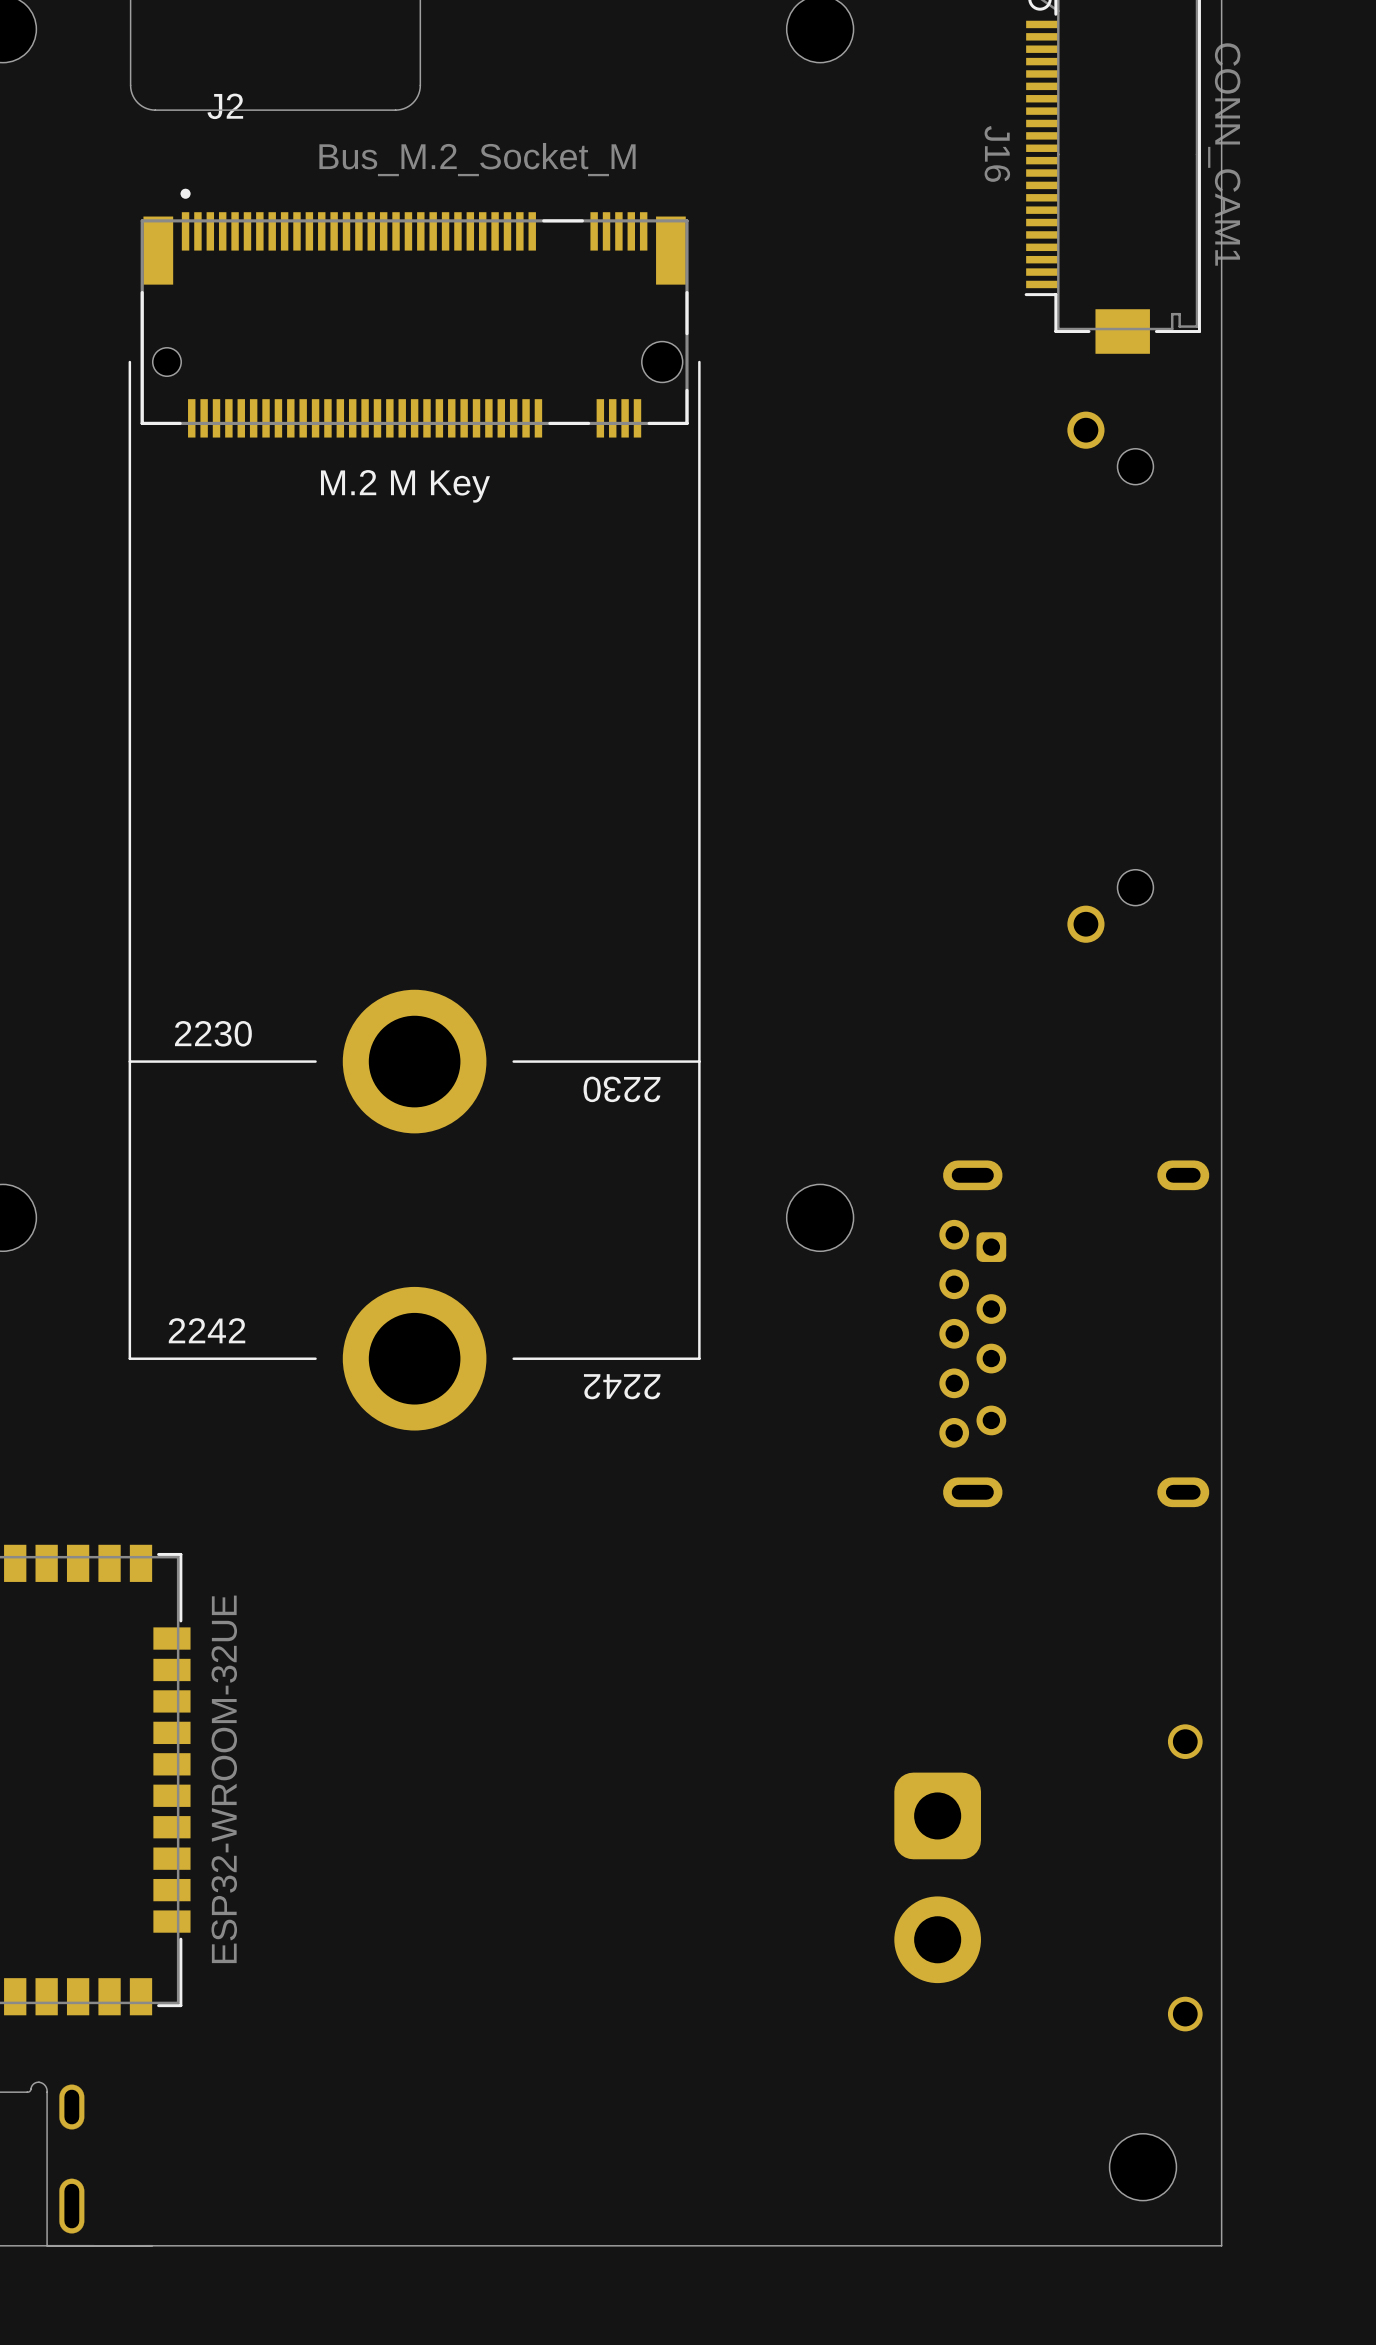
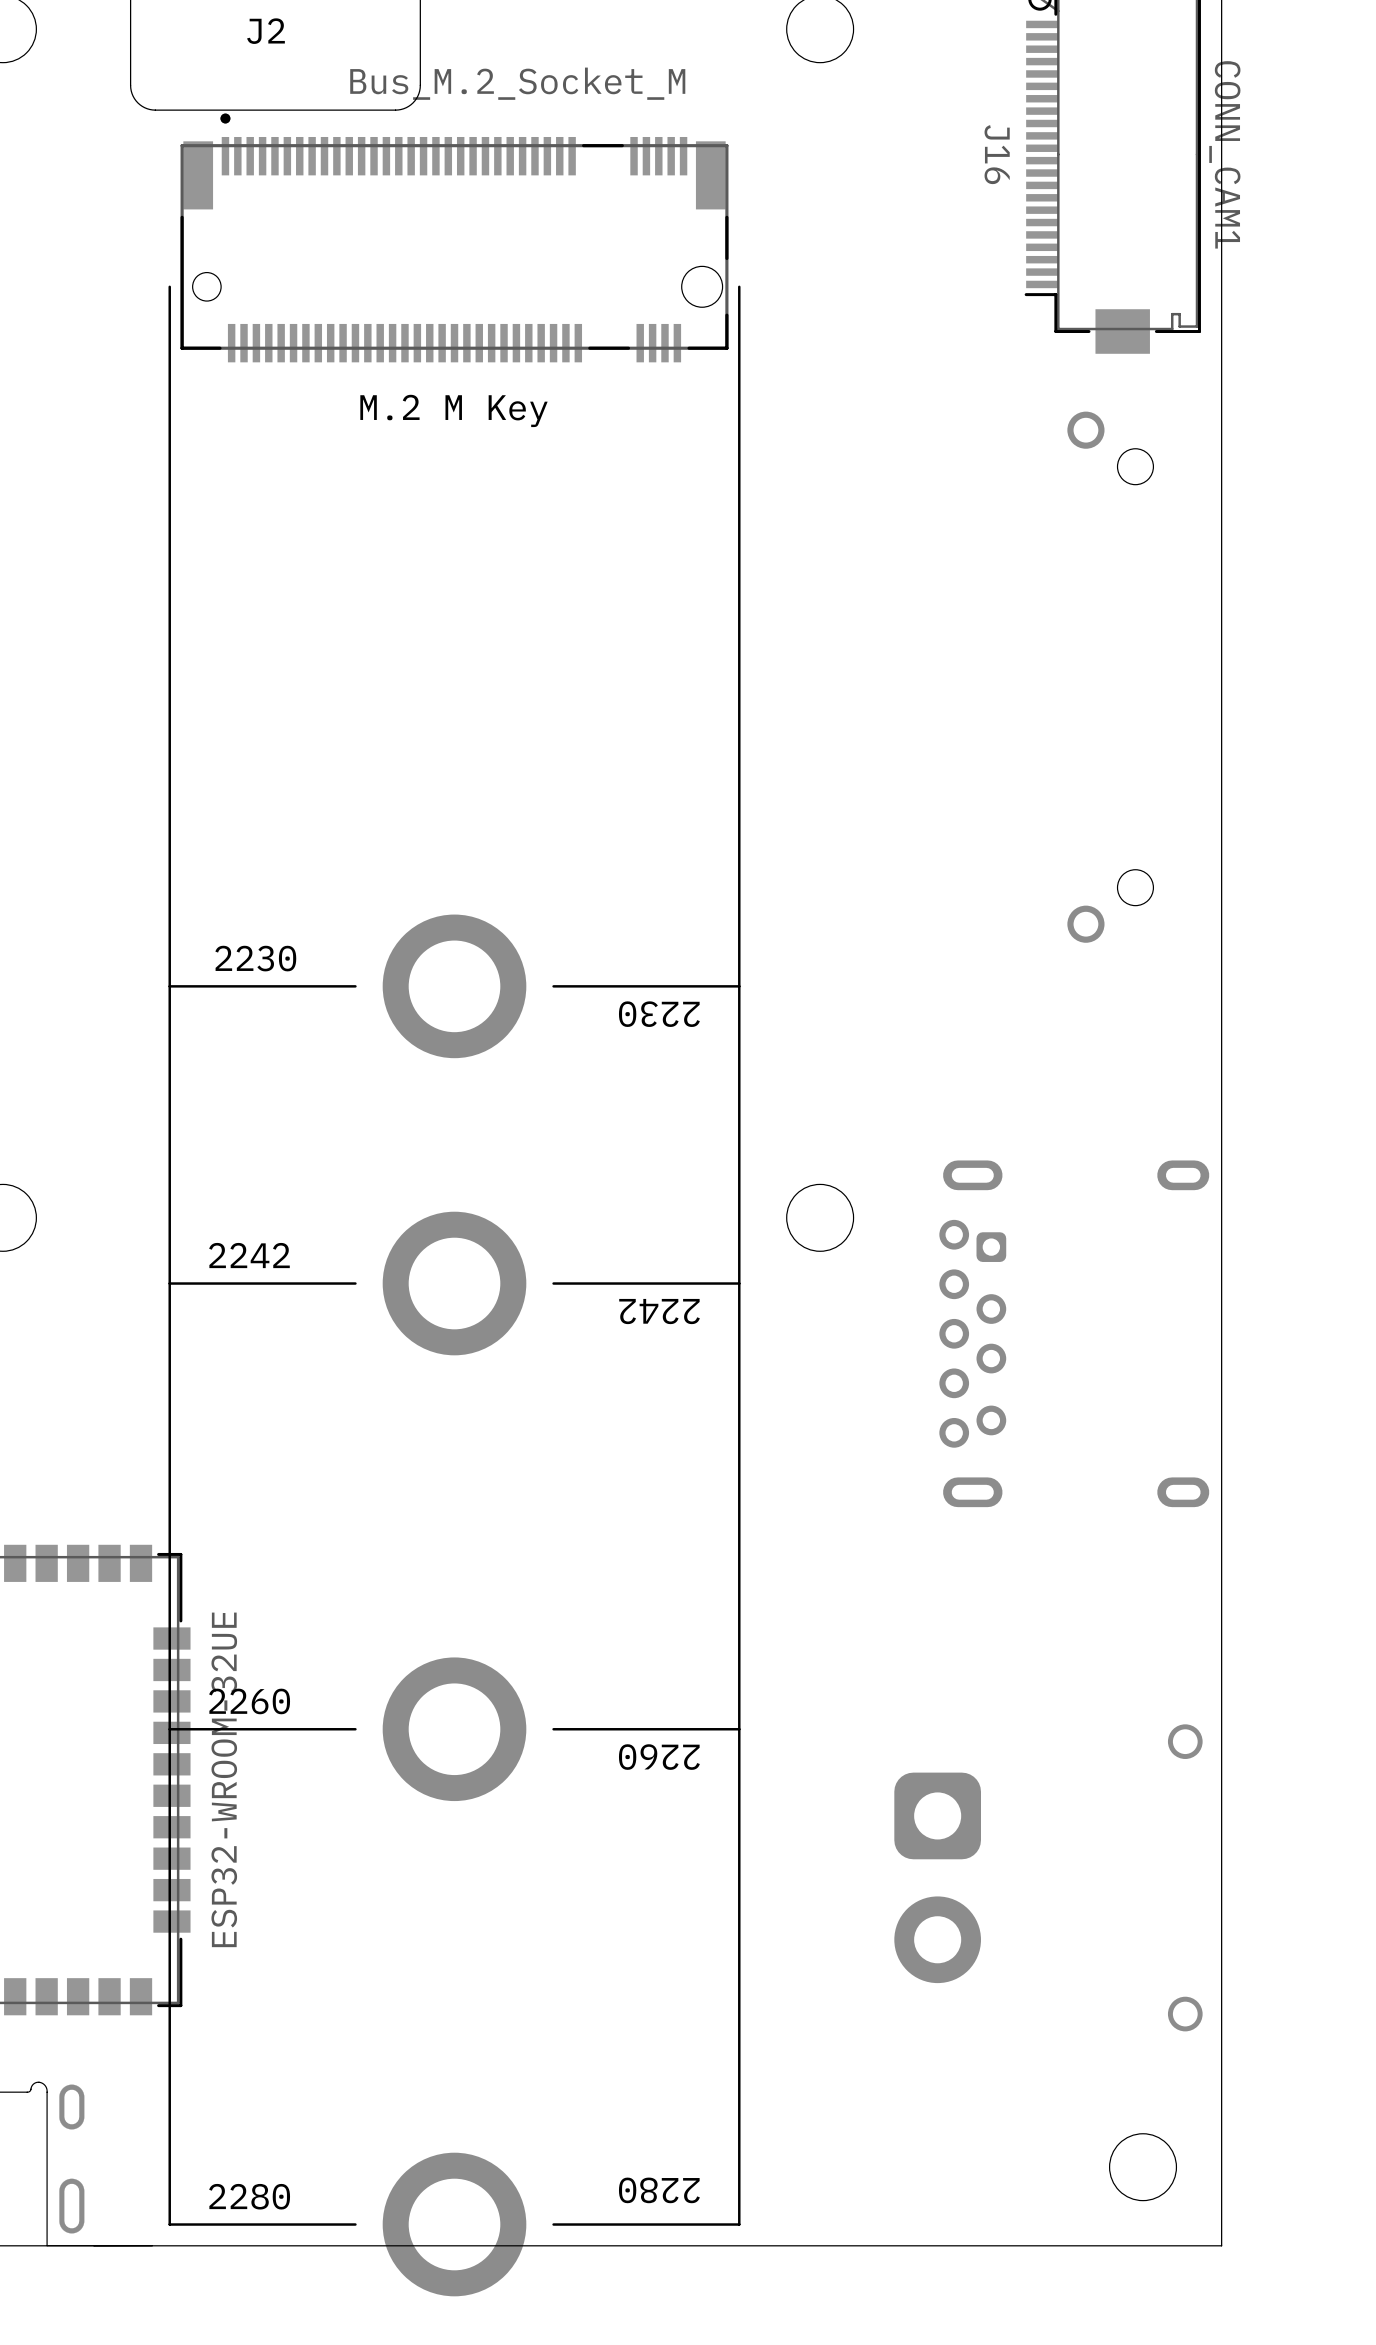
J2 name position: J2 (225, 106) -> J2 (266, 31)
J2 value position: Bus_M.2_Socket_M (477, 159) -> Bus_M.2_Socket_M (517, 83)
J2 footprint: [128, 188, 701, 1431] -> [168, 113, 741, 2297]

